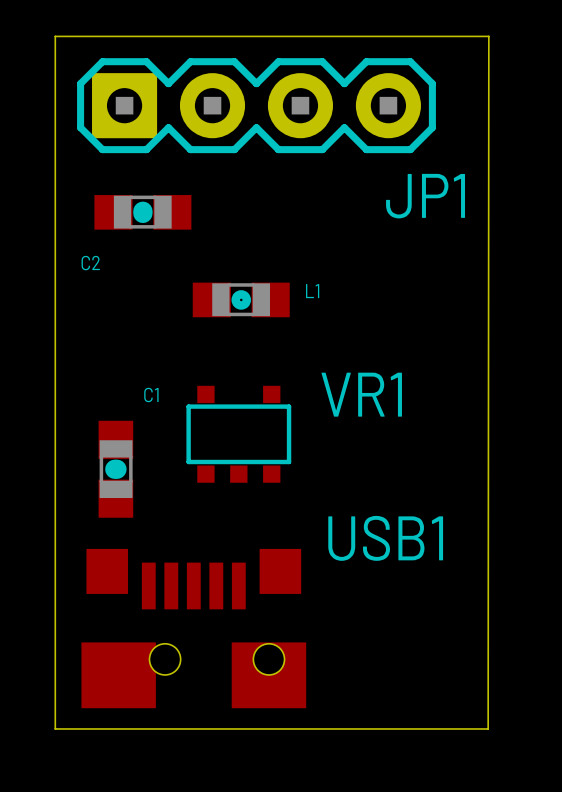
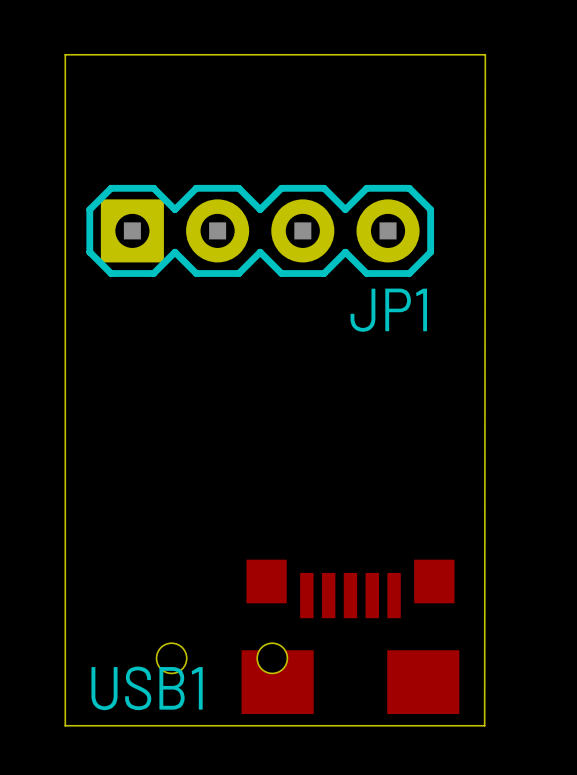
JP1 position: (256, 105) -> (260, 230)
JP1 name position: JP1 (425, 196) -> JP1 (388, 310)
C2: (142, 212) -> none
L1: (241, 299) -> none
VR1: (238, 434) -> none
C1: (115, 469) -> none
USB1 name position: USB1 (385, 538) -> USB1 (147, 688)
USB1 position: (193, 628) -> (350, 636)

